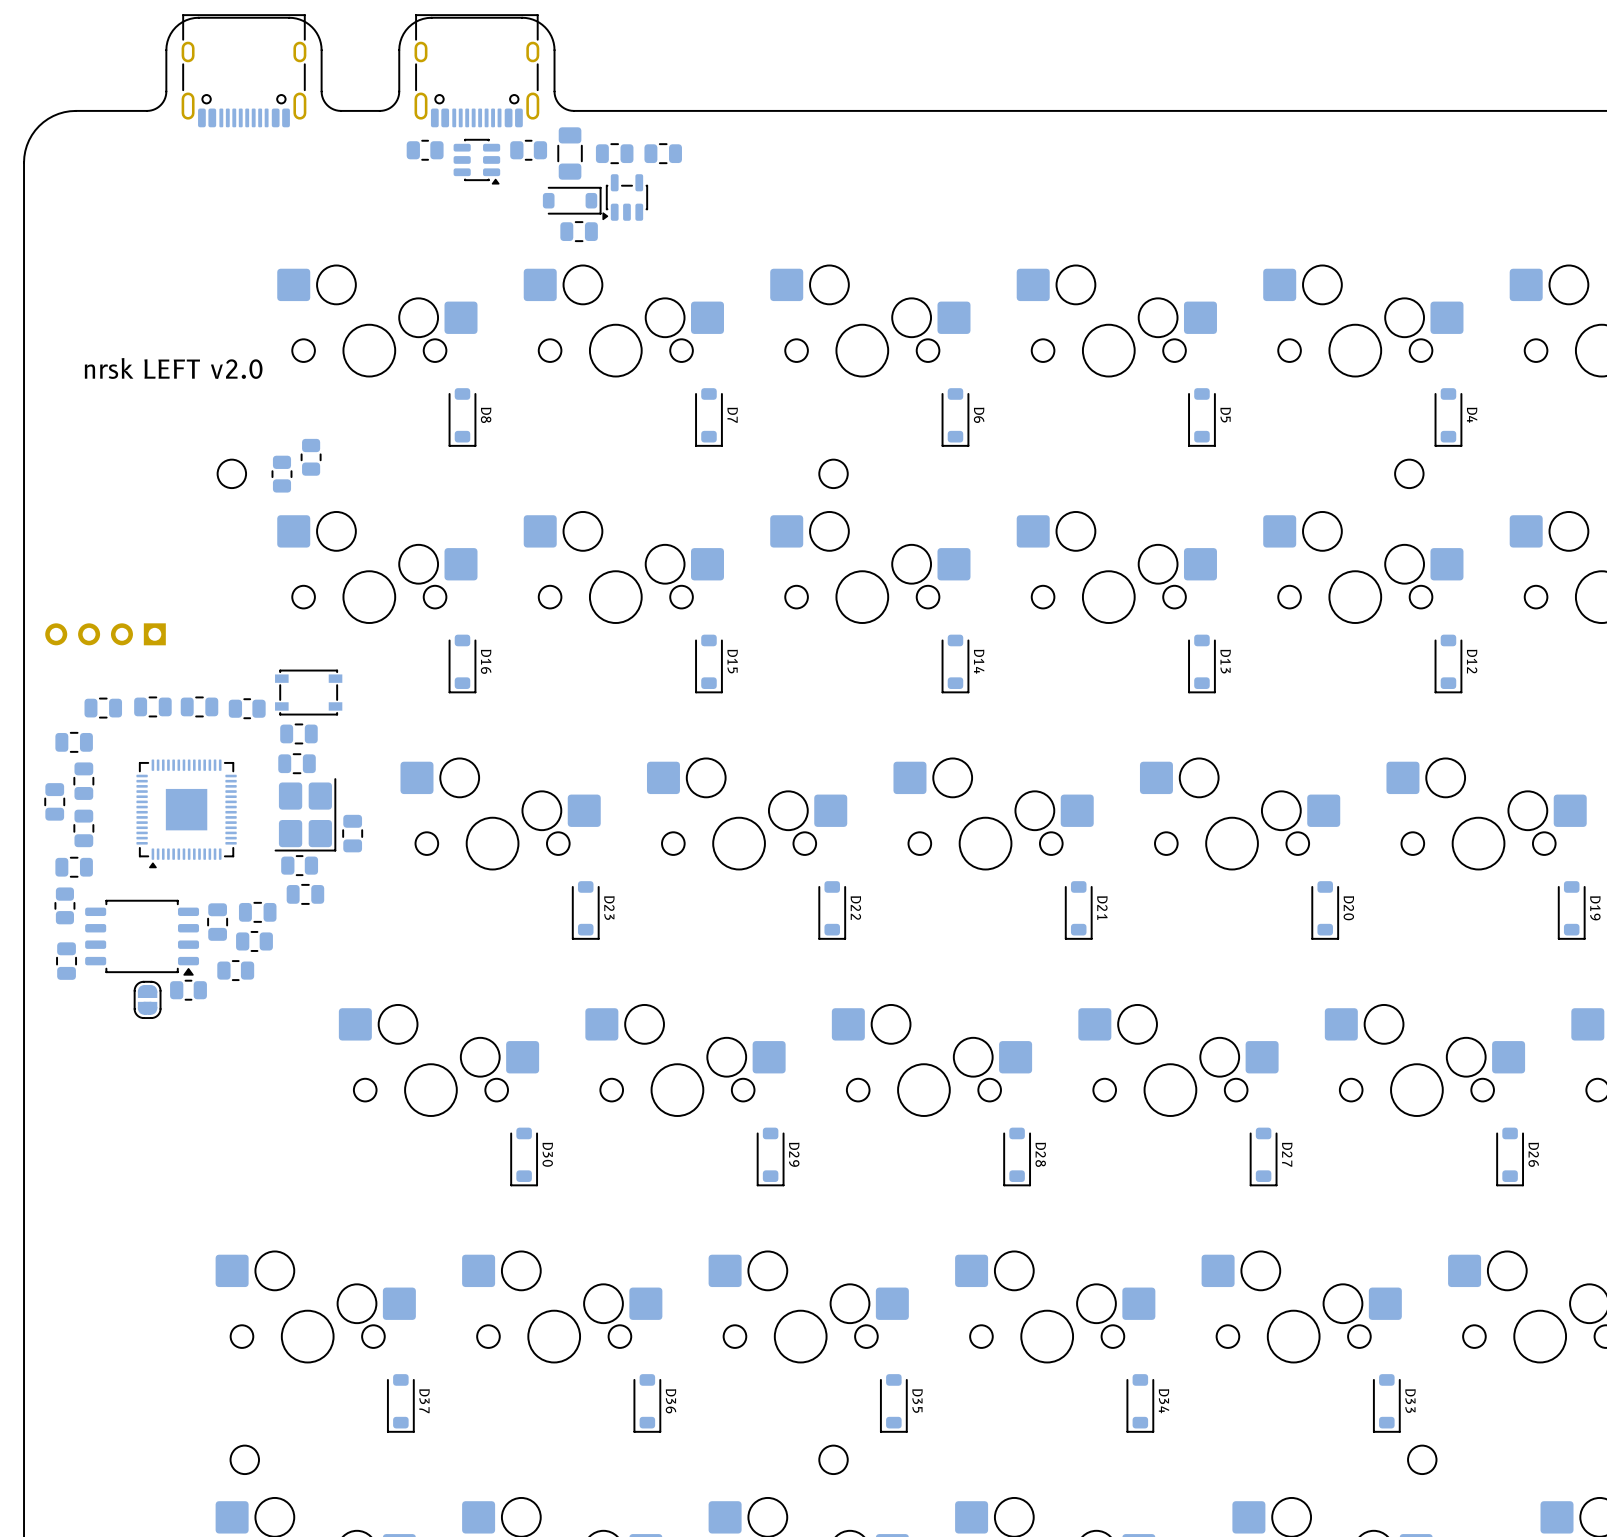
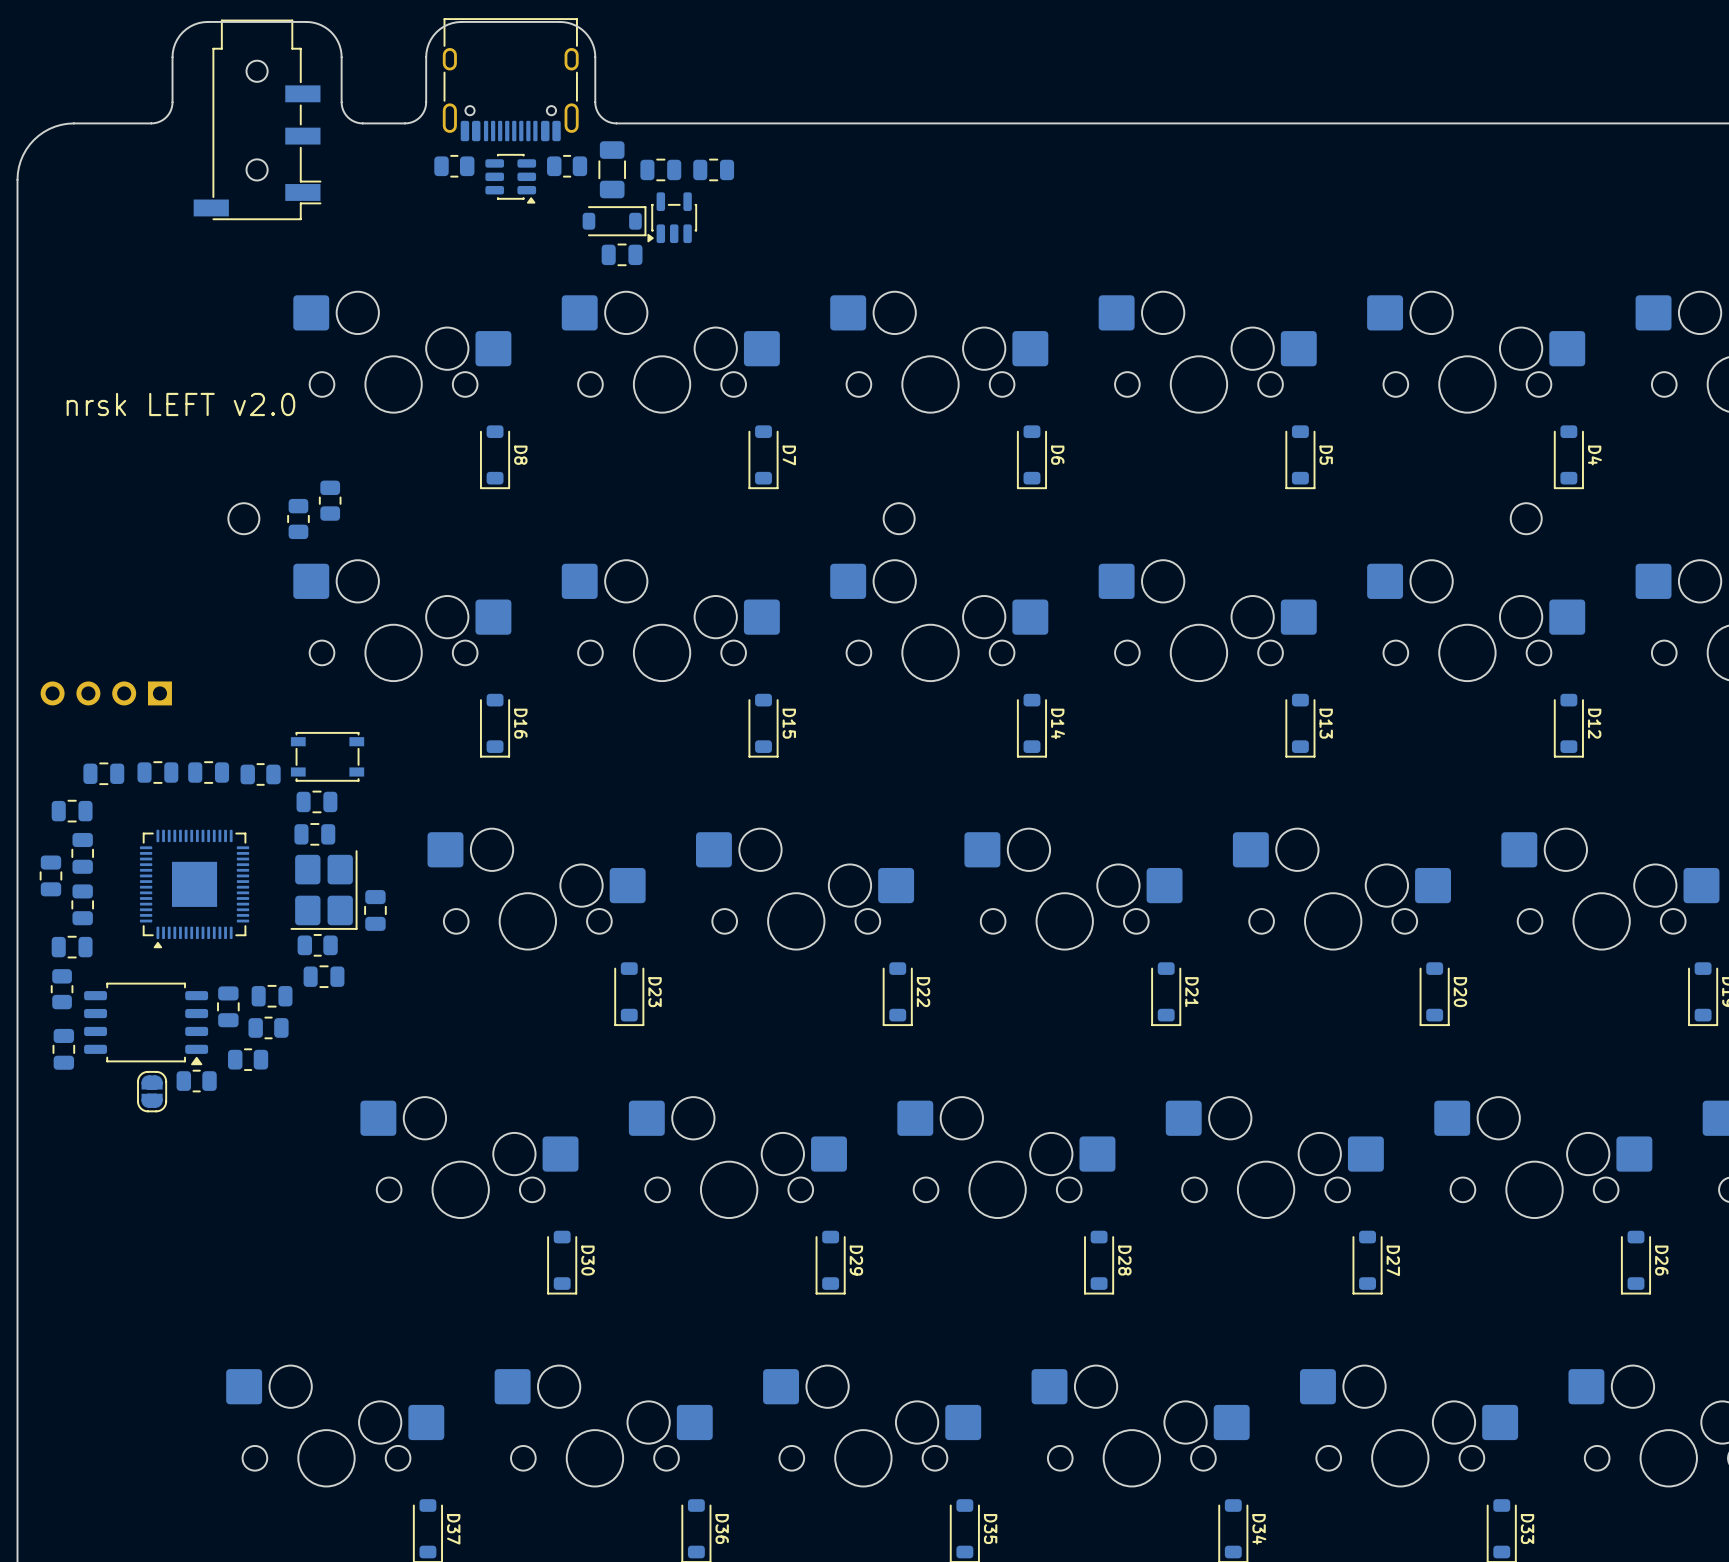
part: (243, 70) -> none
part: none -> (257, 119)

